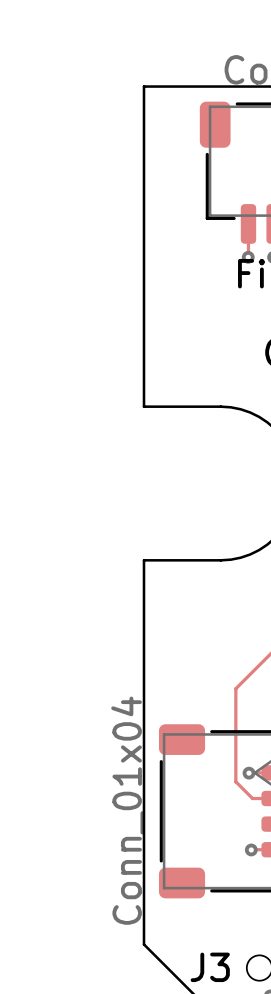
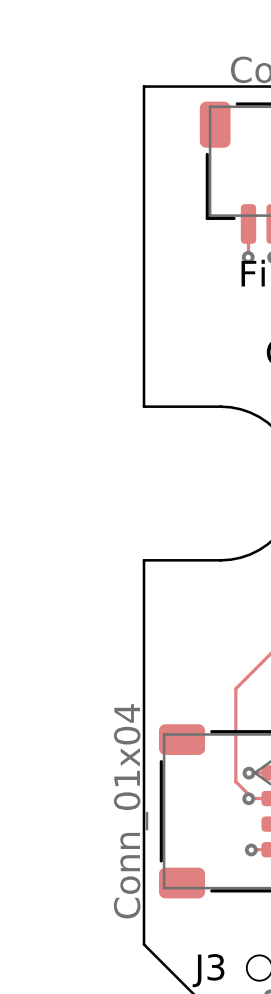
via: none -> (248, 798)

